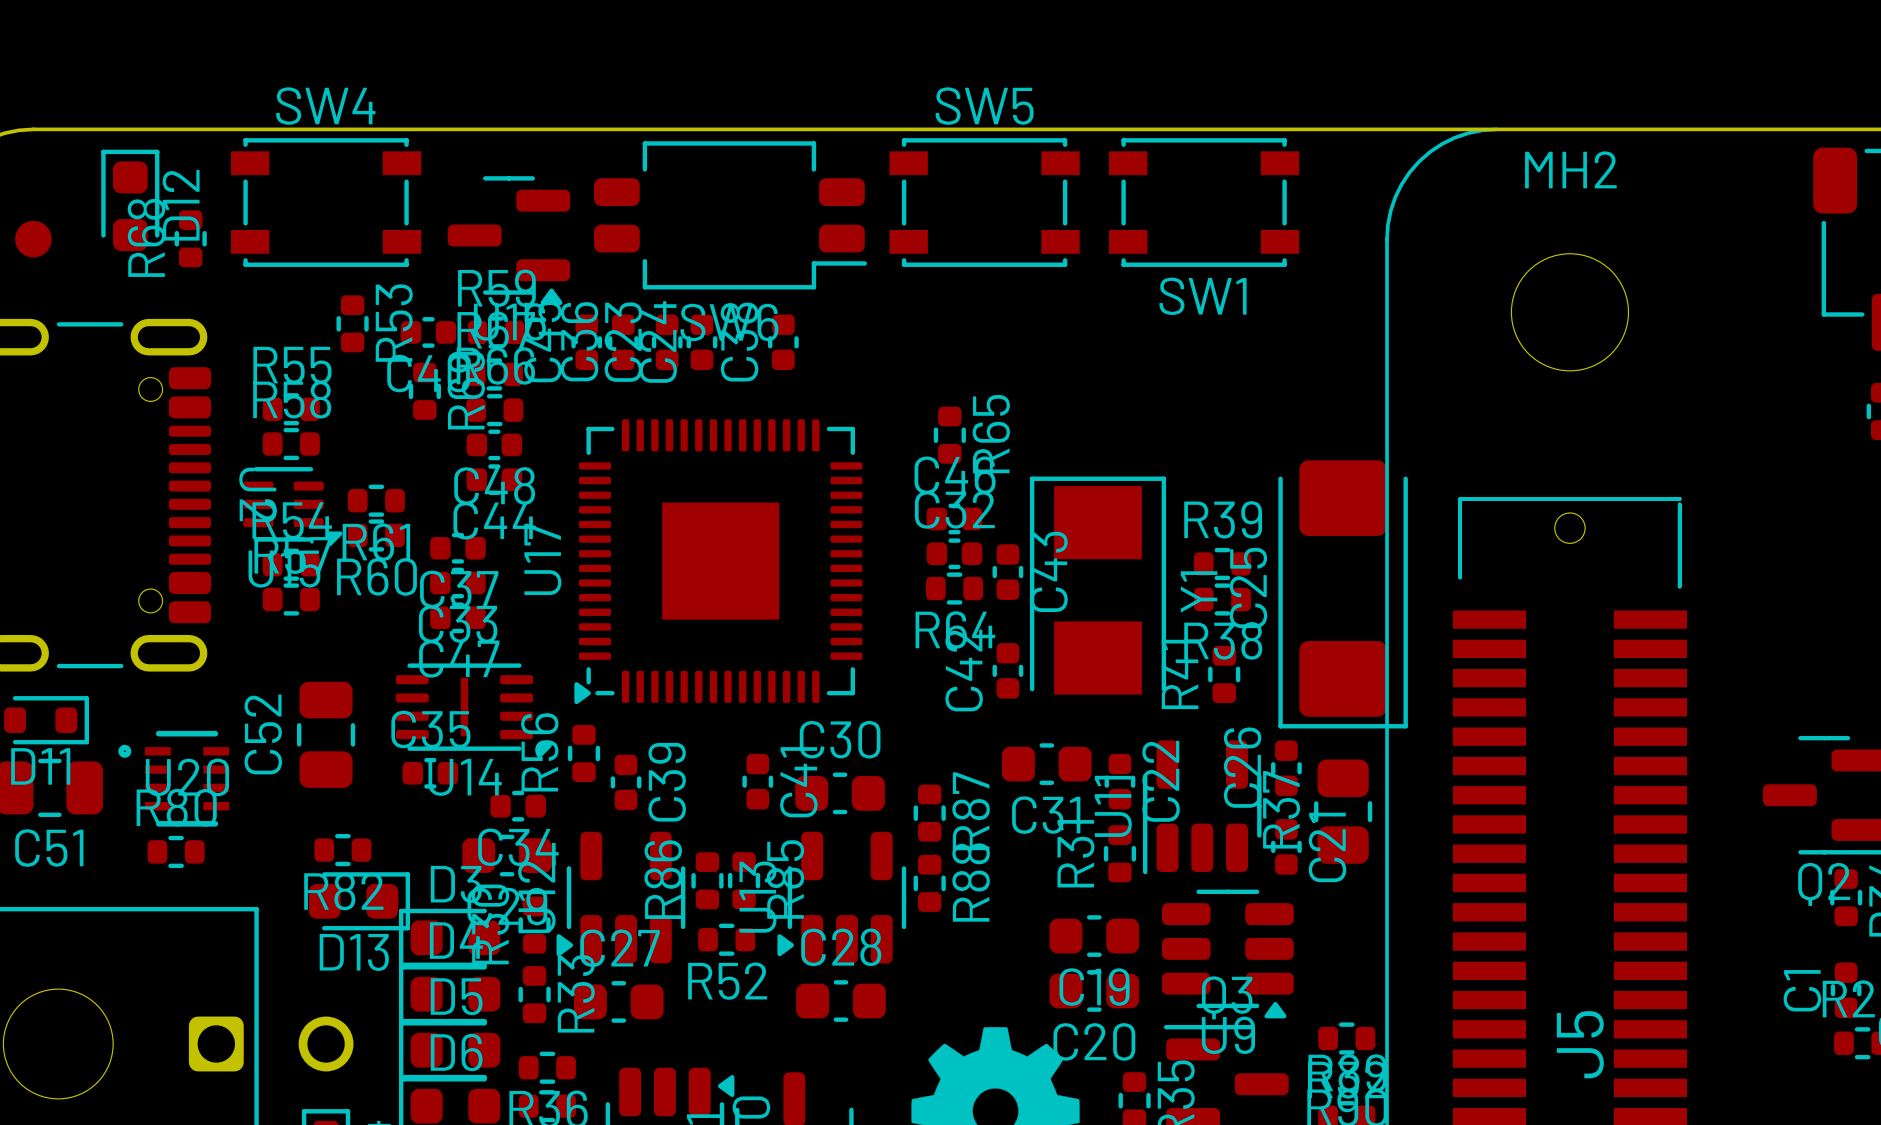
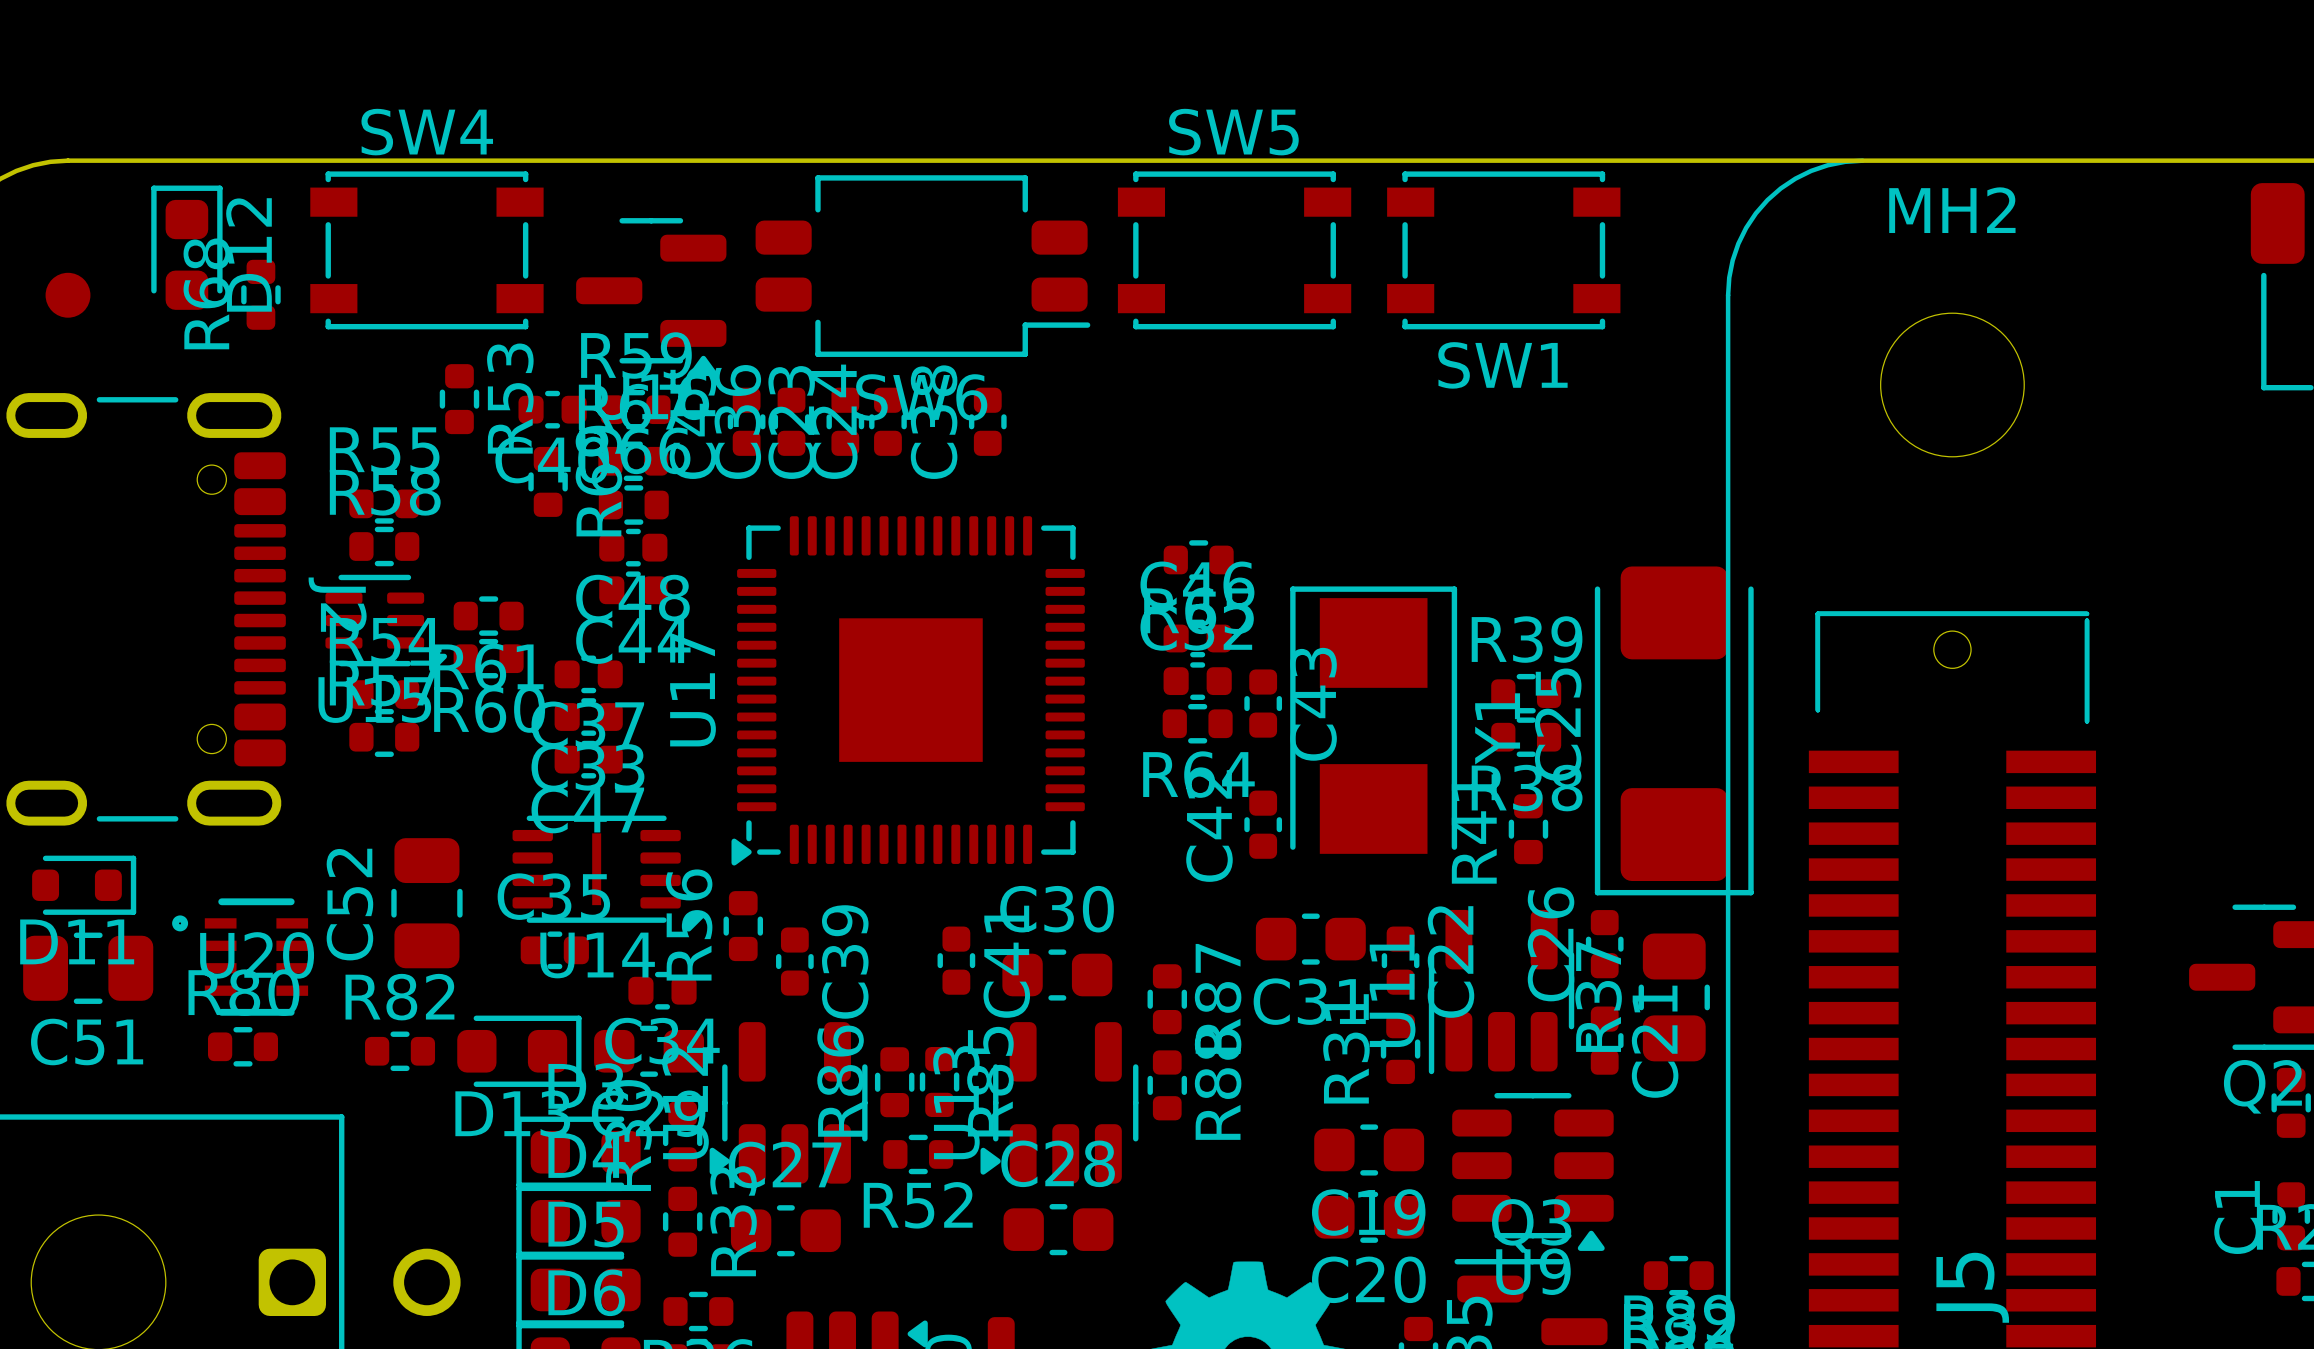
R65 rotation: 0° (949, 435) -> 90° clockwise (1198, 559)
R82 position: (342, 850) -> (400, 1051)
R82 name position: R82 (343, 891) -> R82 (399, 997)
D13 position: (359, 901) -> (519, 1051)

